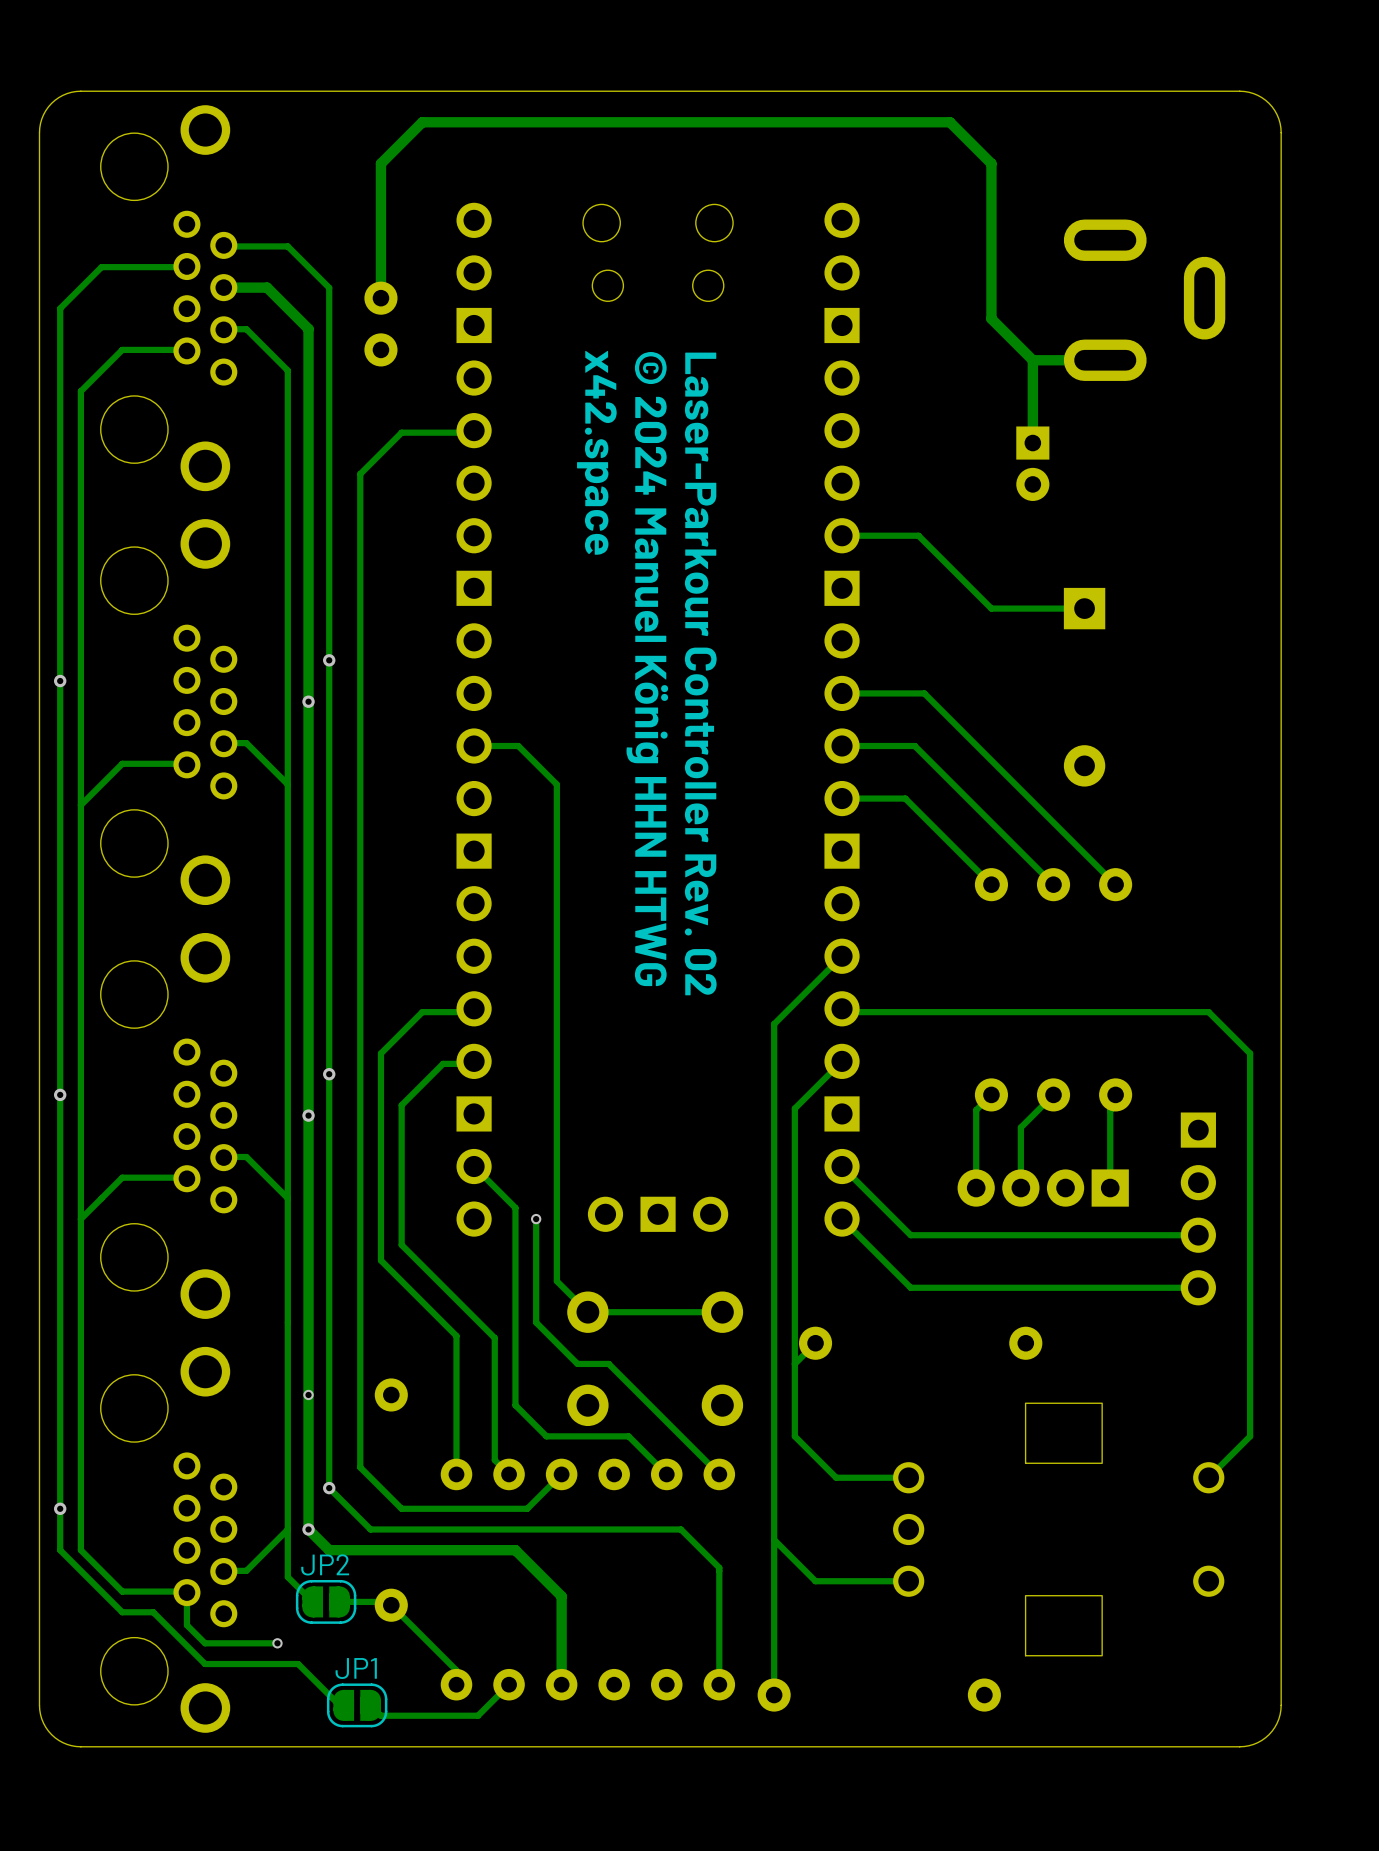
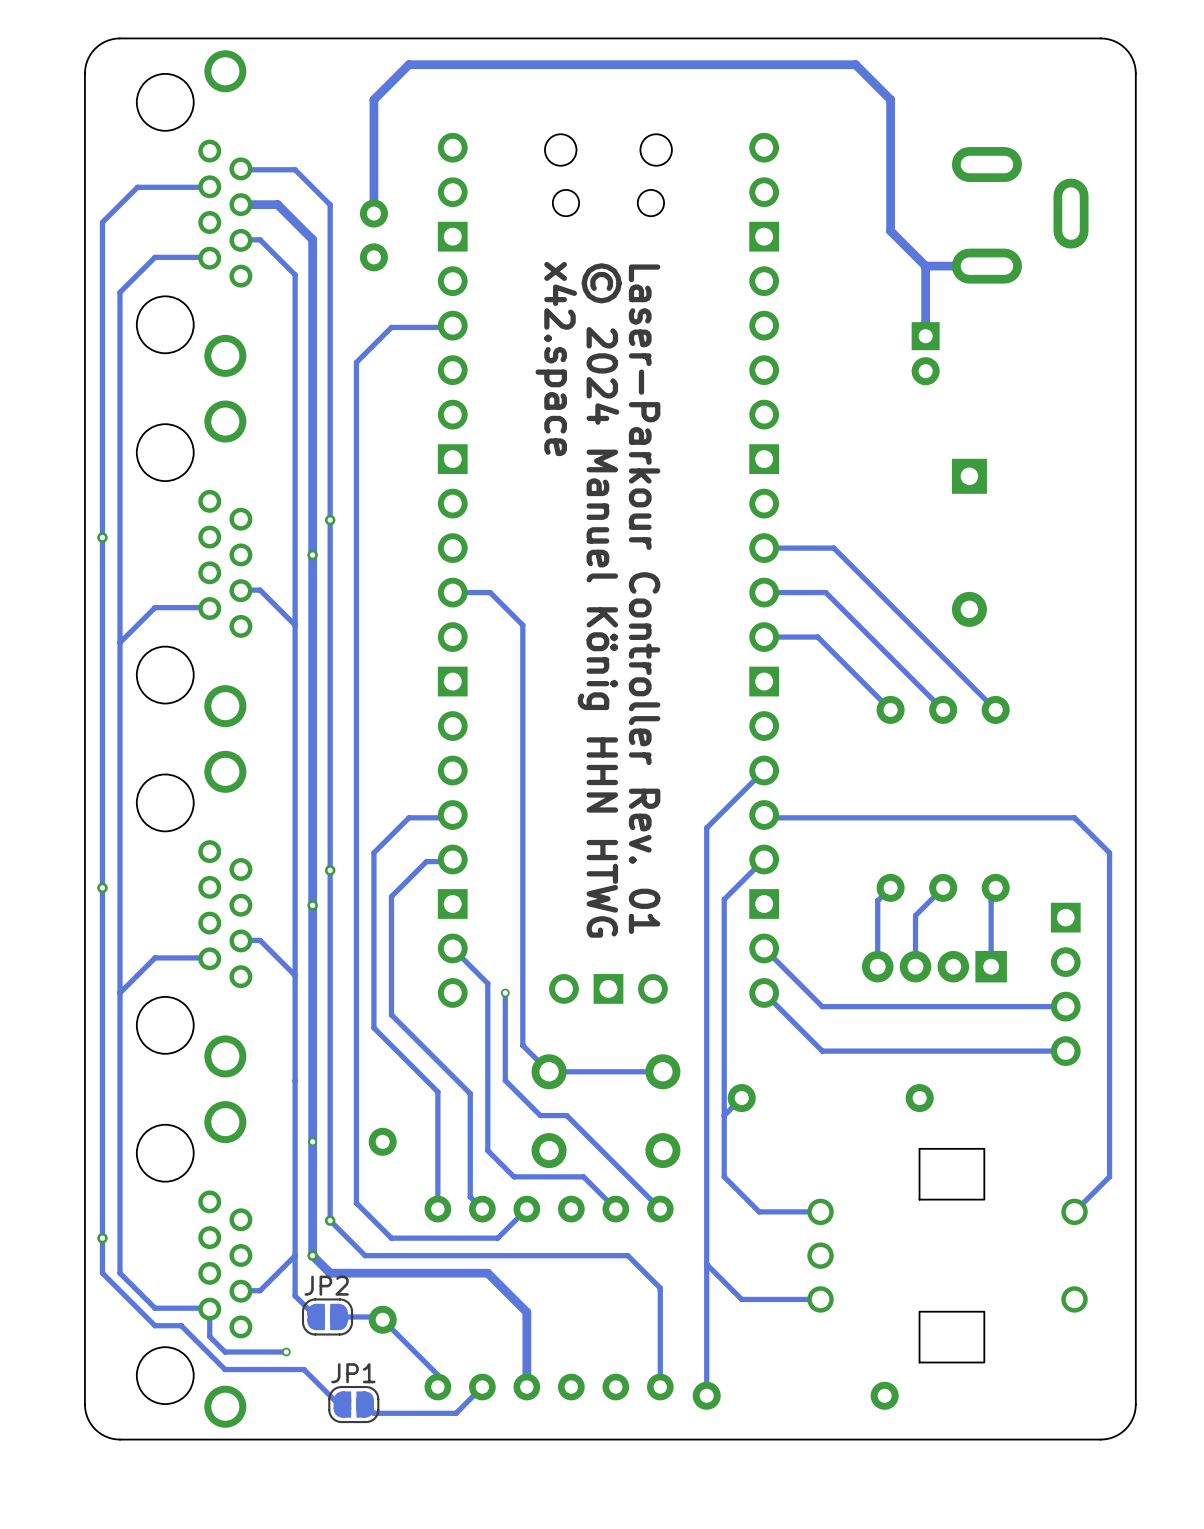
track: (842, 535) (918, 535) (991, 608) (1084, 608) -> none
text: Laser-Parkour Controller Rev. 02 (700, 673) -> Laser-Parkour Controller Rev. 01 (644, 599)

